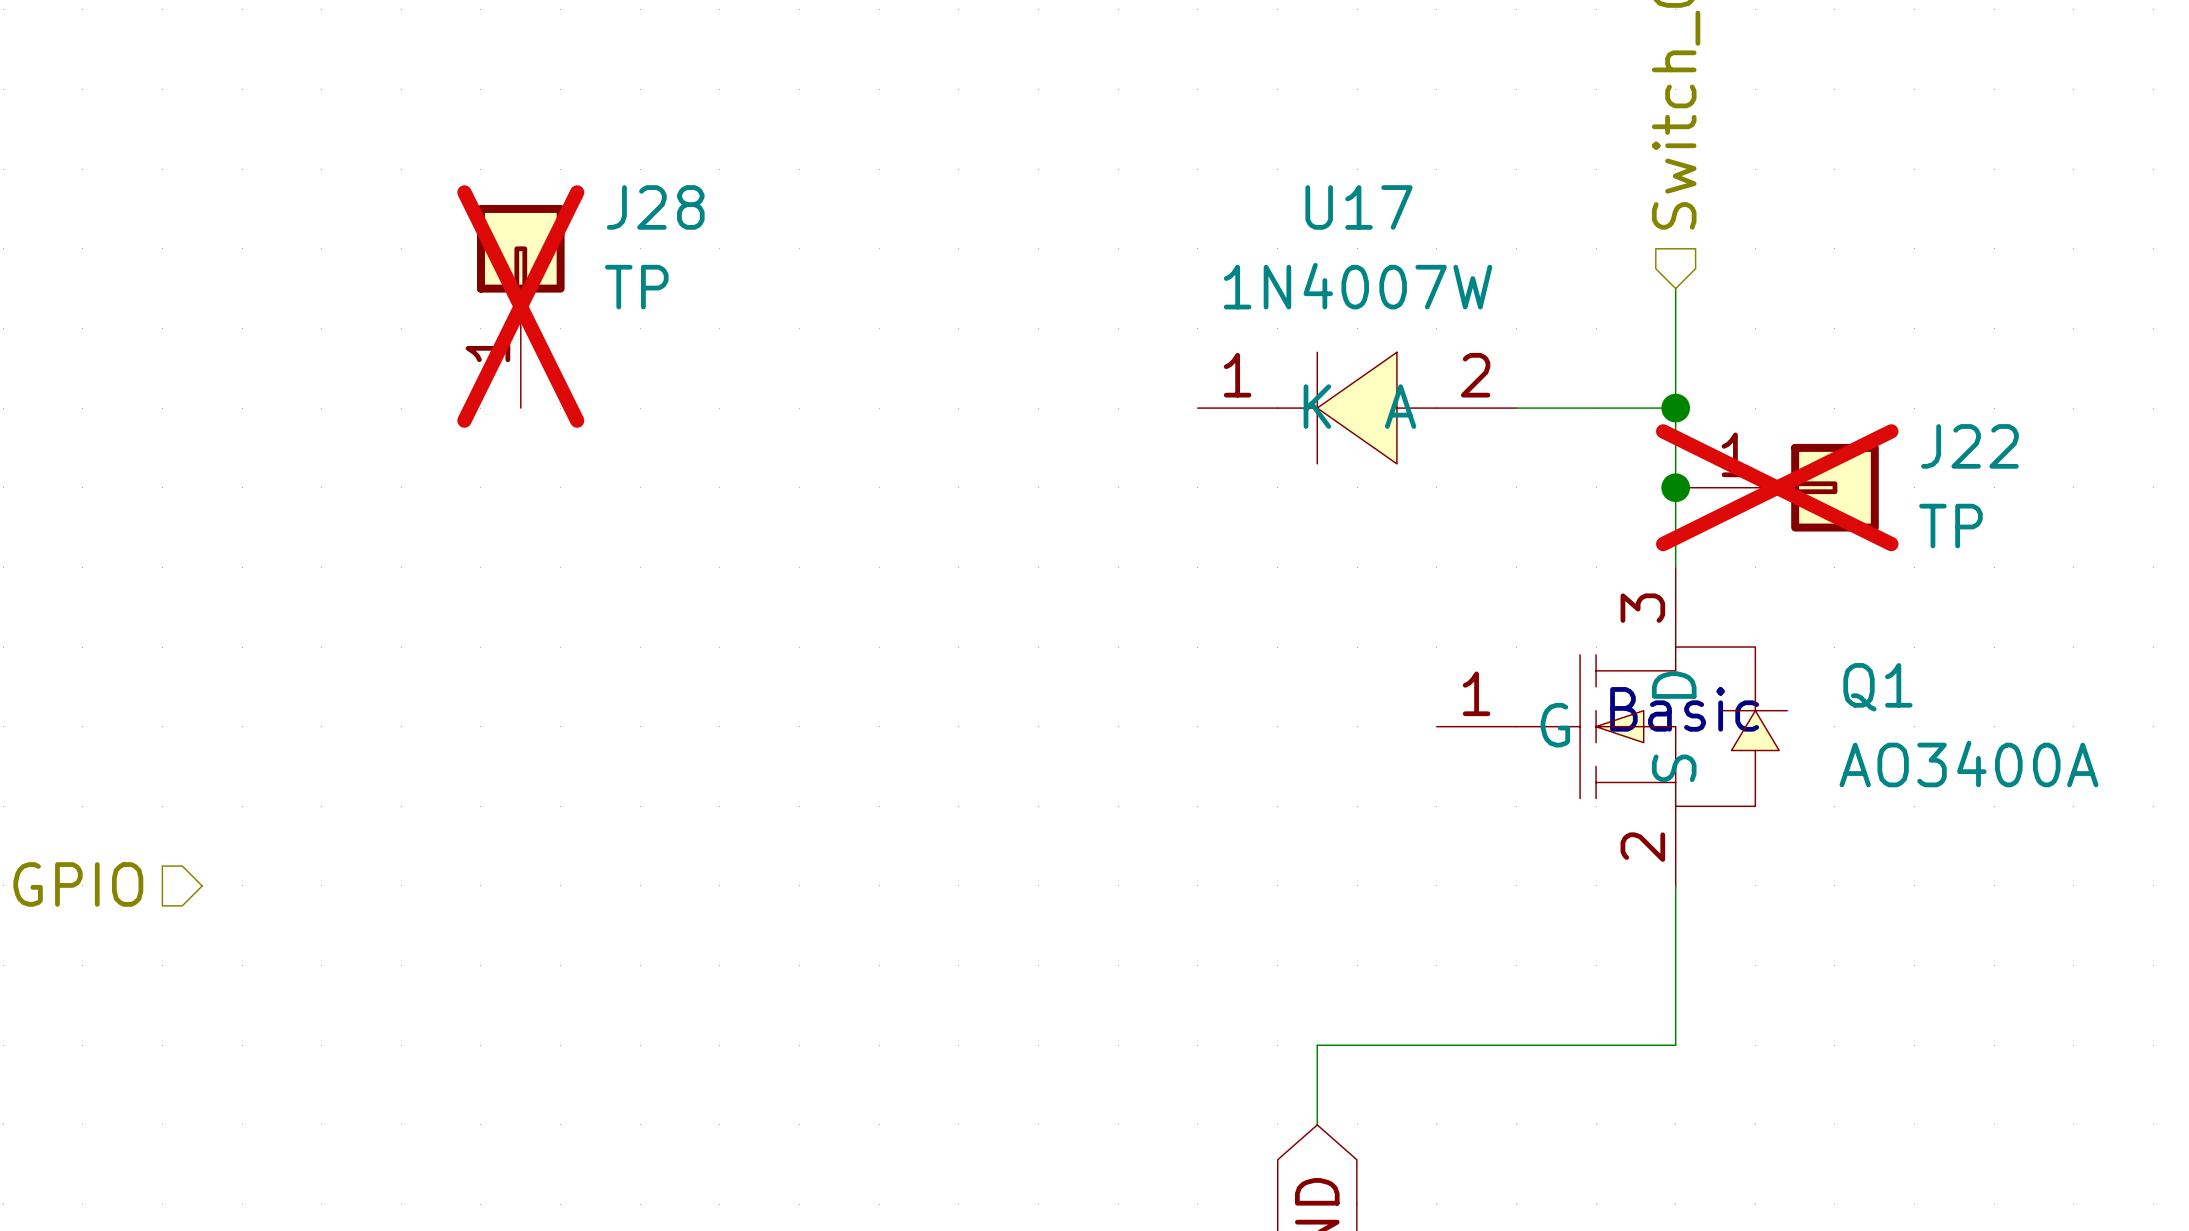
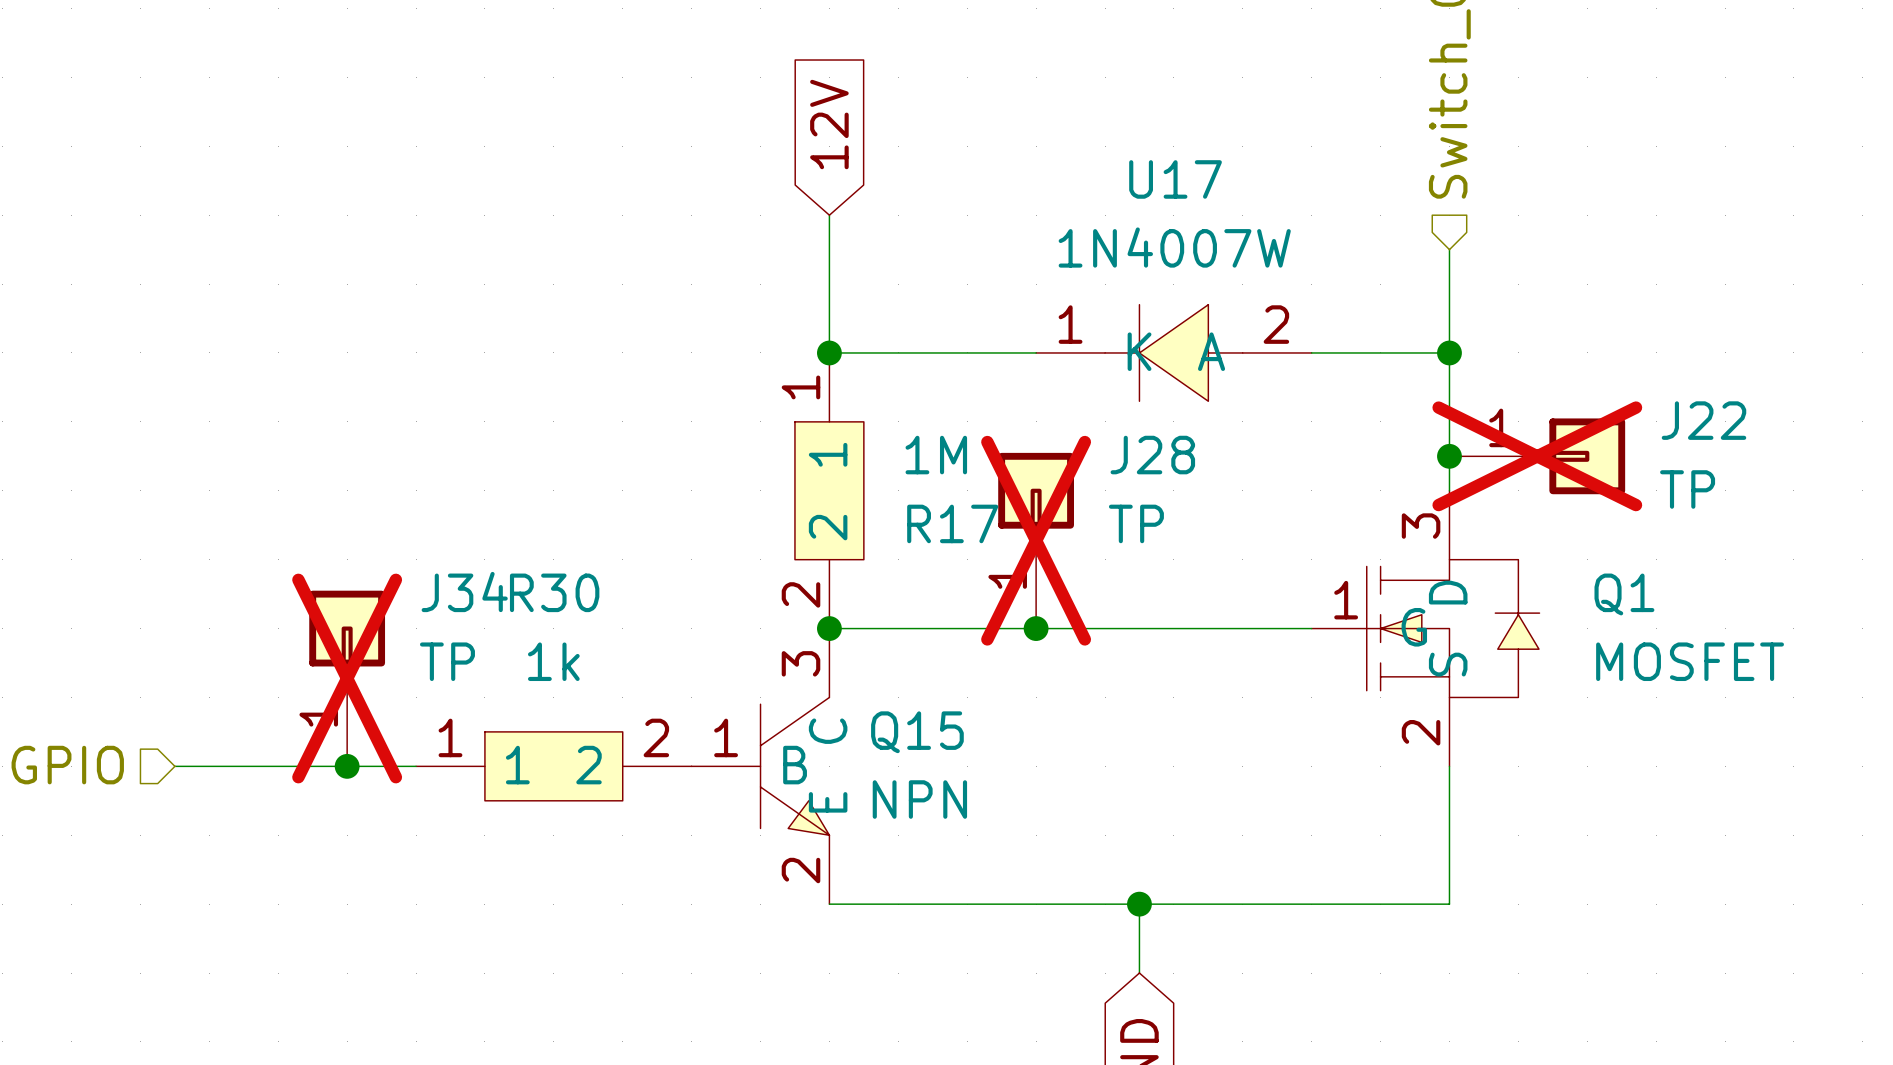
global label: none -> 12V (829, 124)
wire: none -> (829, 215) (829, 352) (1036, 352)
J28 position: (520, 306) -> (1036, 540)
junction: none -> (829, 352)
junction position: (1675, 487) -> (1449, 456)
J22 position: (1777, 487) -> (1537, 456)
R17: none -> 1M (829, 490)
Q1 symbol: [1436, 567, 1788, 886] -> [1311, 490, 1540, 767]
text: Basic (1684, 709) -> none
wire: none -> (829, 628) (1311, 628)
junction: none -> (829, 628)
junction: none -> (1036, 628)
Q1 value: AO3400A (1968, 764) -> MOSFET (1690, 661)
J34: none -> TP (347, 678)
wire: none -> (174, 766) (416, 766)
junction: none -> (347, 766)
R30: none -> 1k (553, 766)
Q15: none -> NPN (760, 766)
wire: none -> (829, 904) (1139, 904)
junction: none -> (1139, 904)

